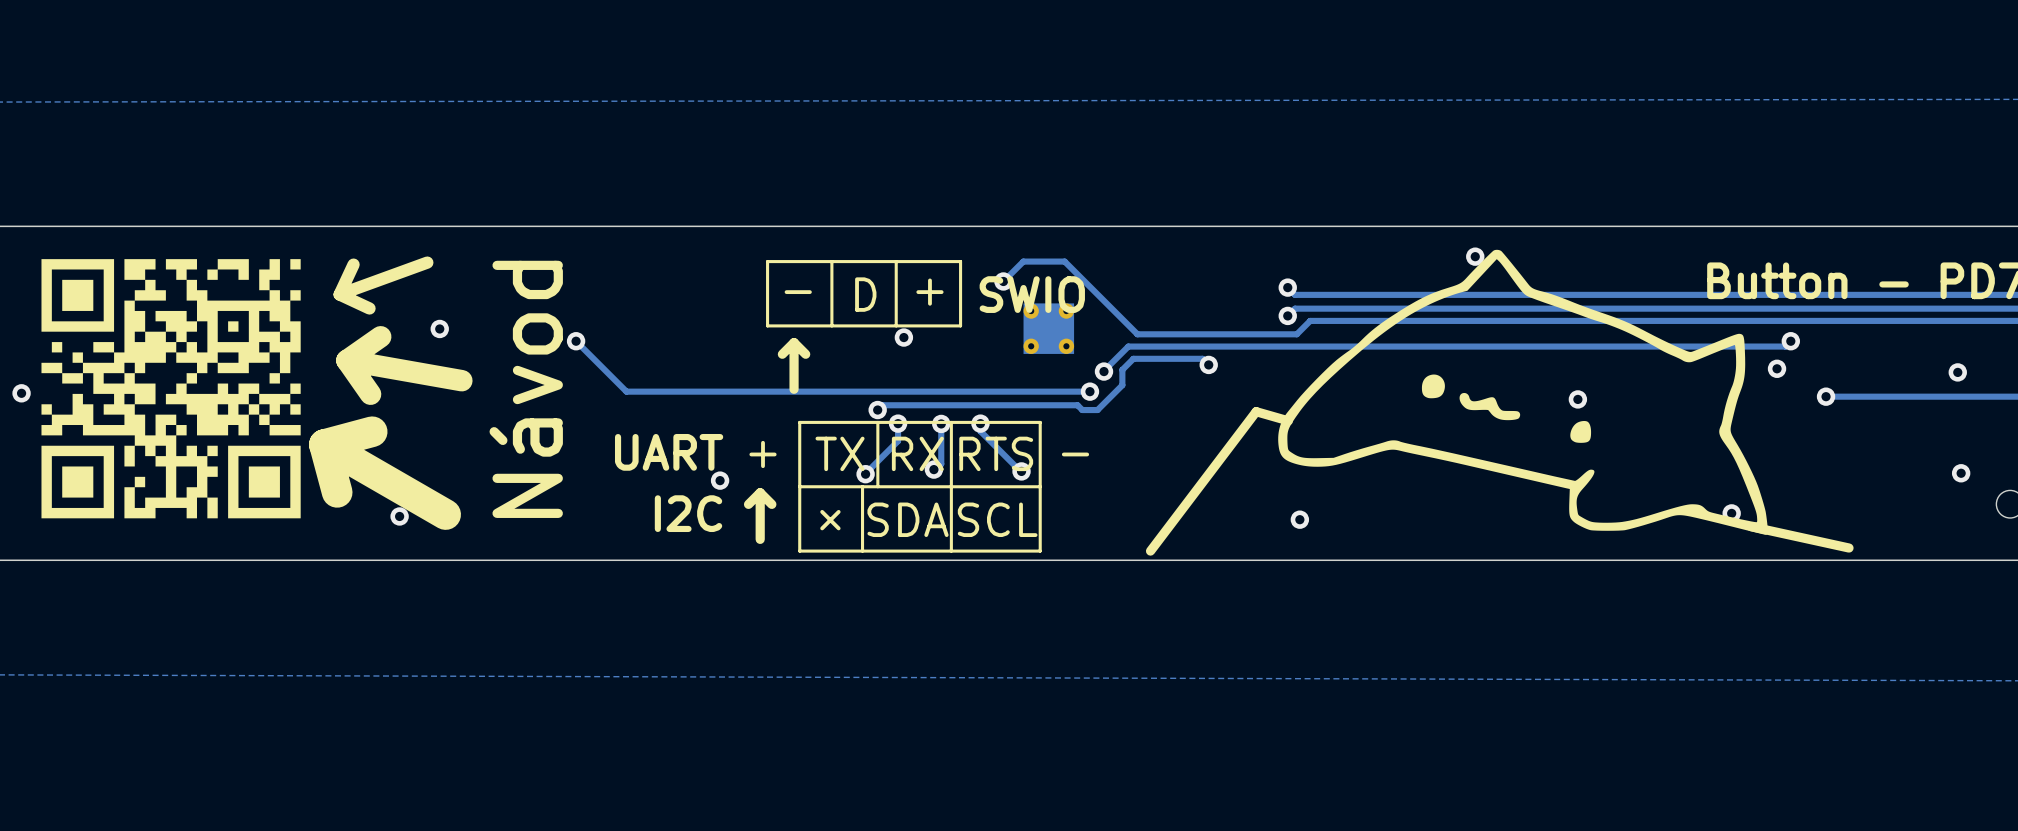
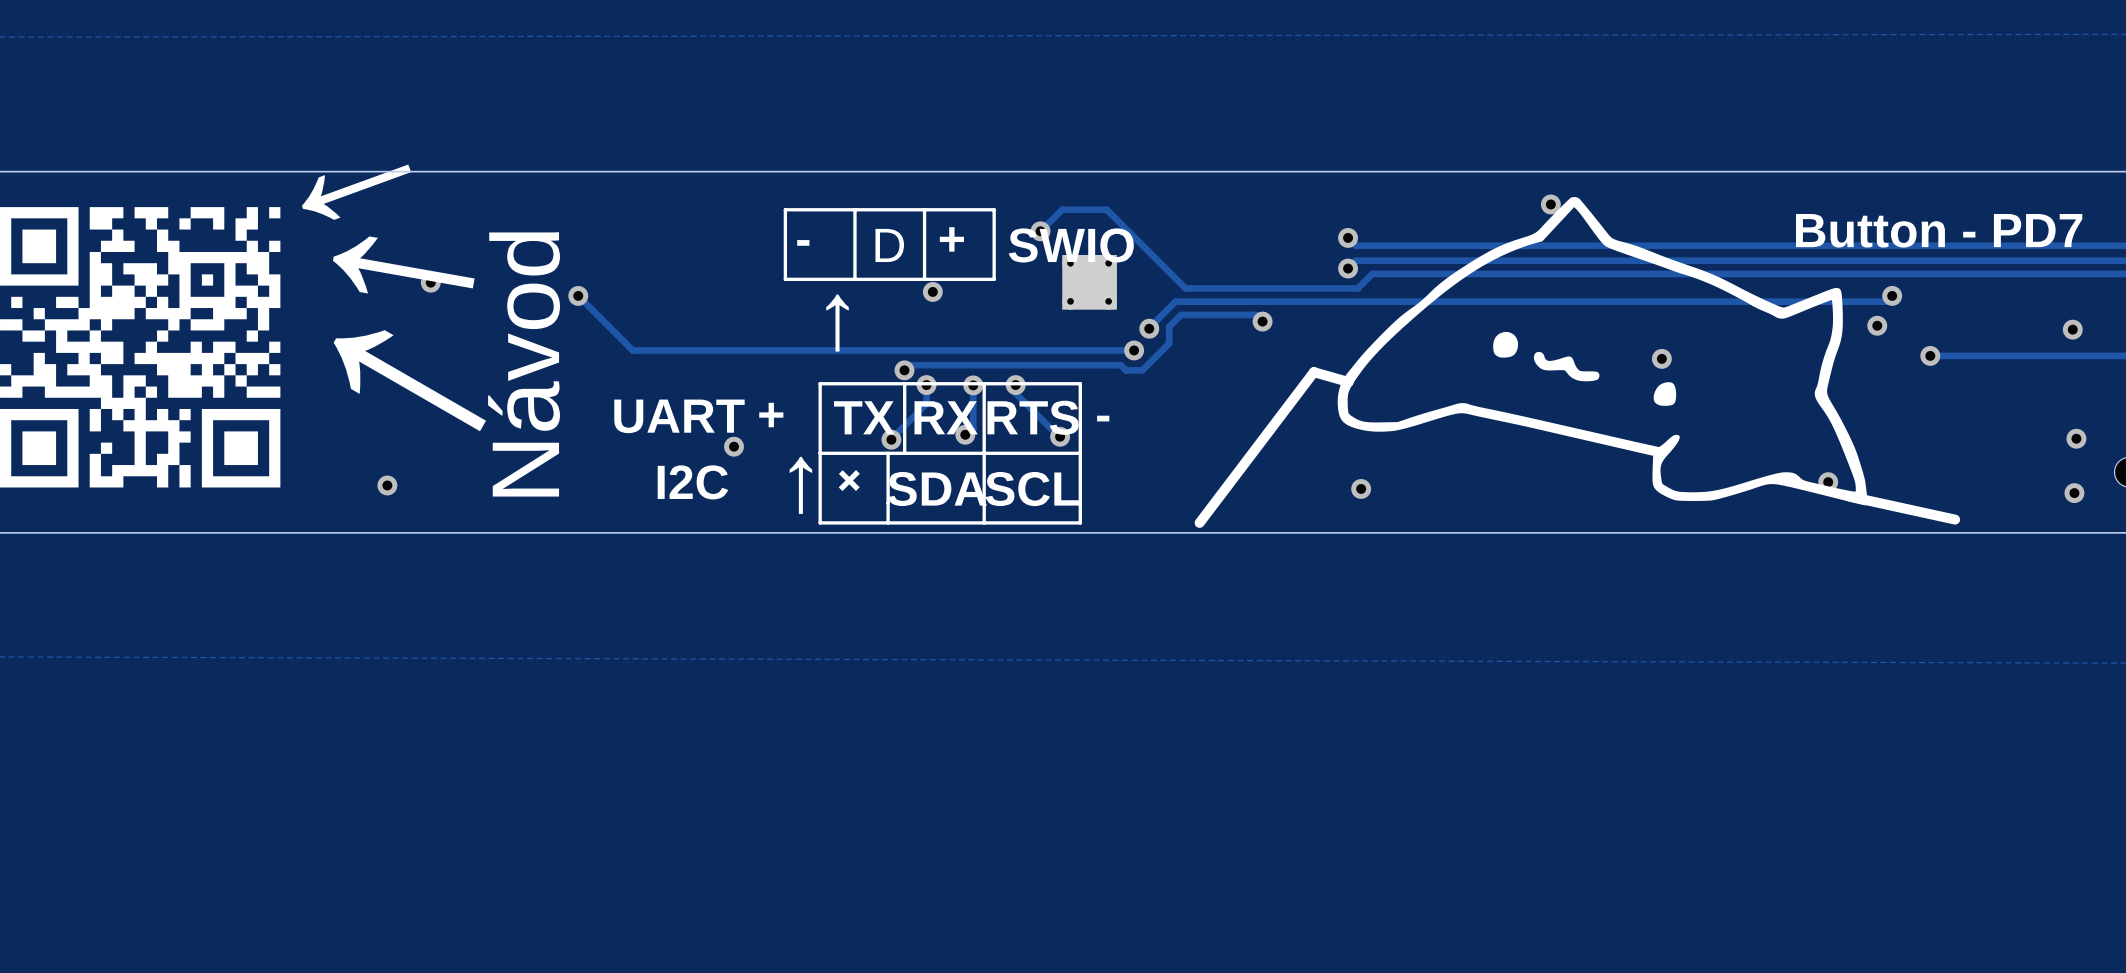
via: none -> (2074, 493)

